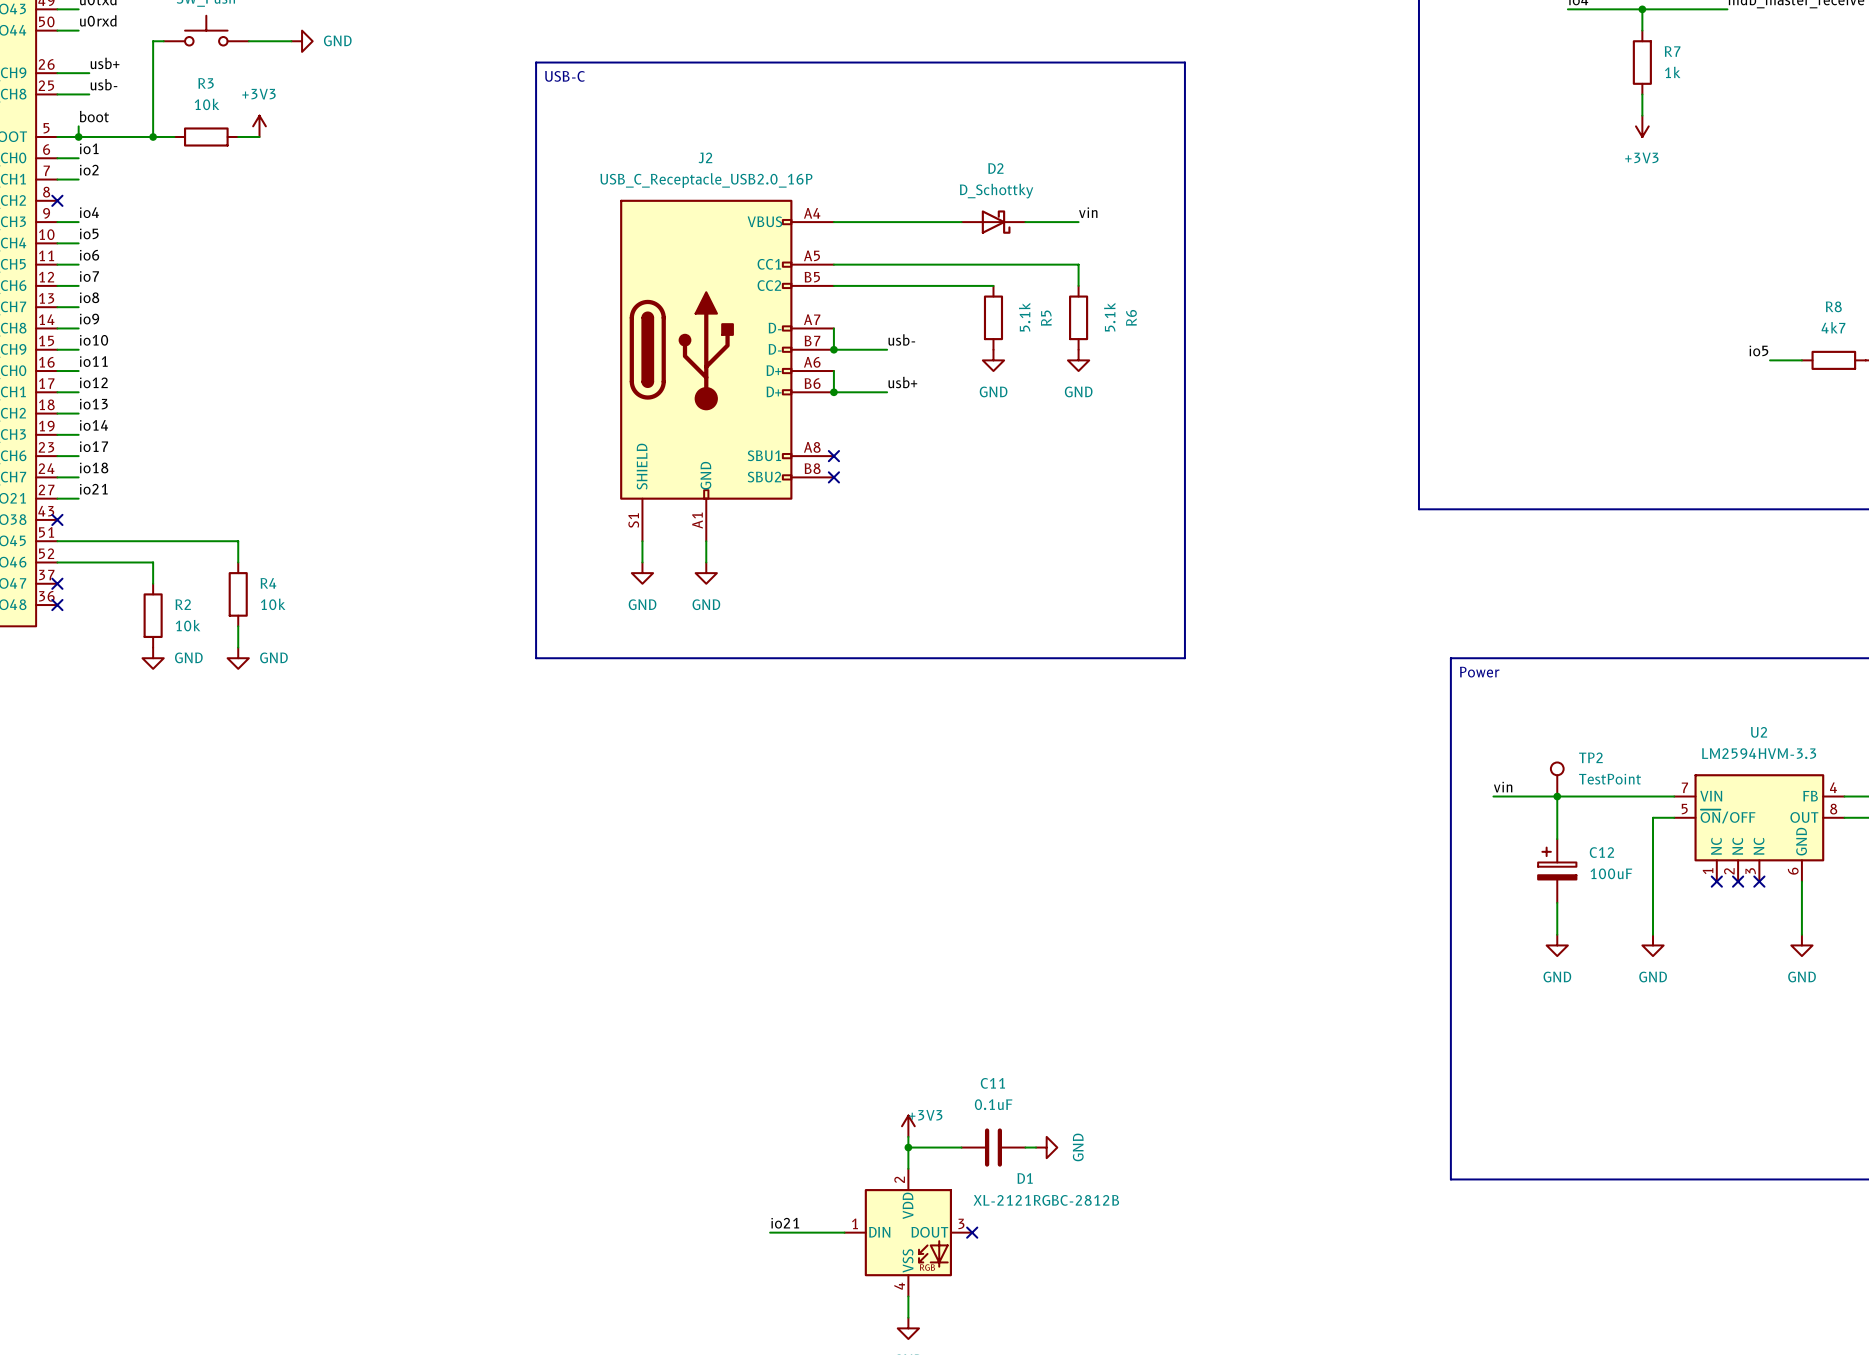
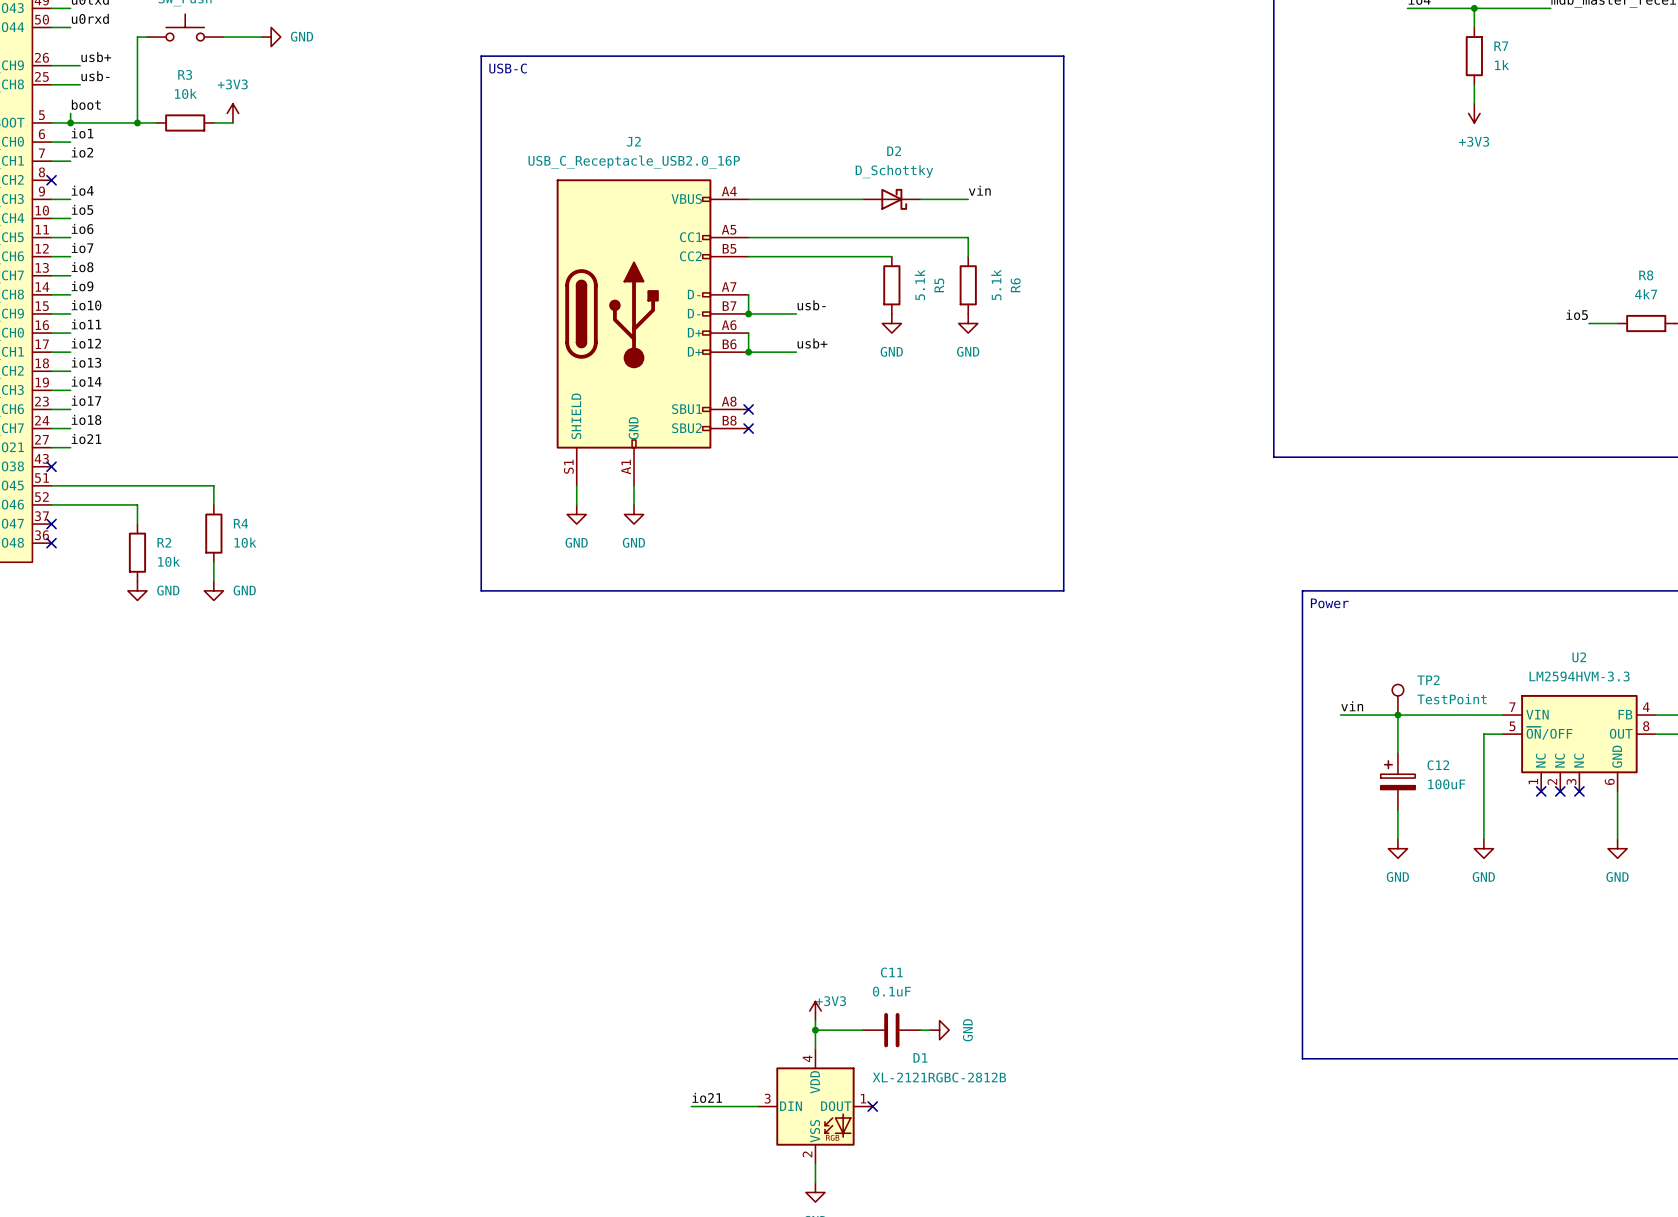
D1 pin number: 2 (899, 1179) -> 4 (807, 1058)
D1 pin number: 1 (855, 1223) -> 3 (767, 1098)
D1 pin number: 3 (961, 1223) -> 1 (863, 1098)
D1 pin number: 4 (899, 1286) -> 2 (807, 1154)

